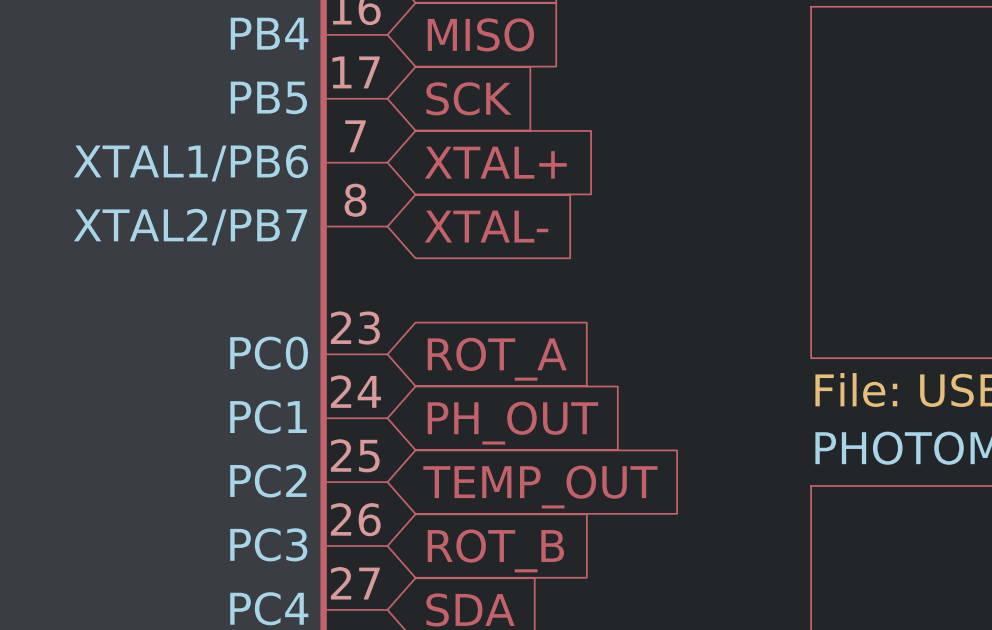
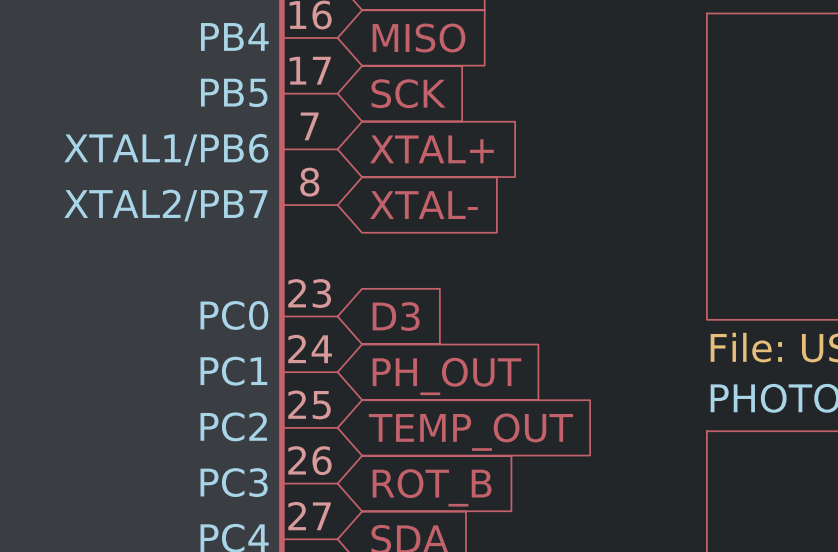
global label: ROT_A (497, 359) -> D3 (396, 316)

